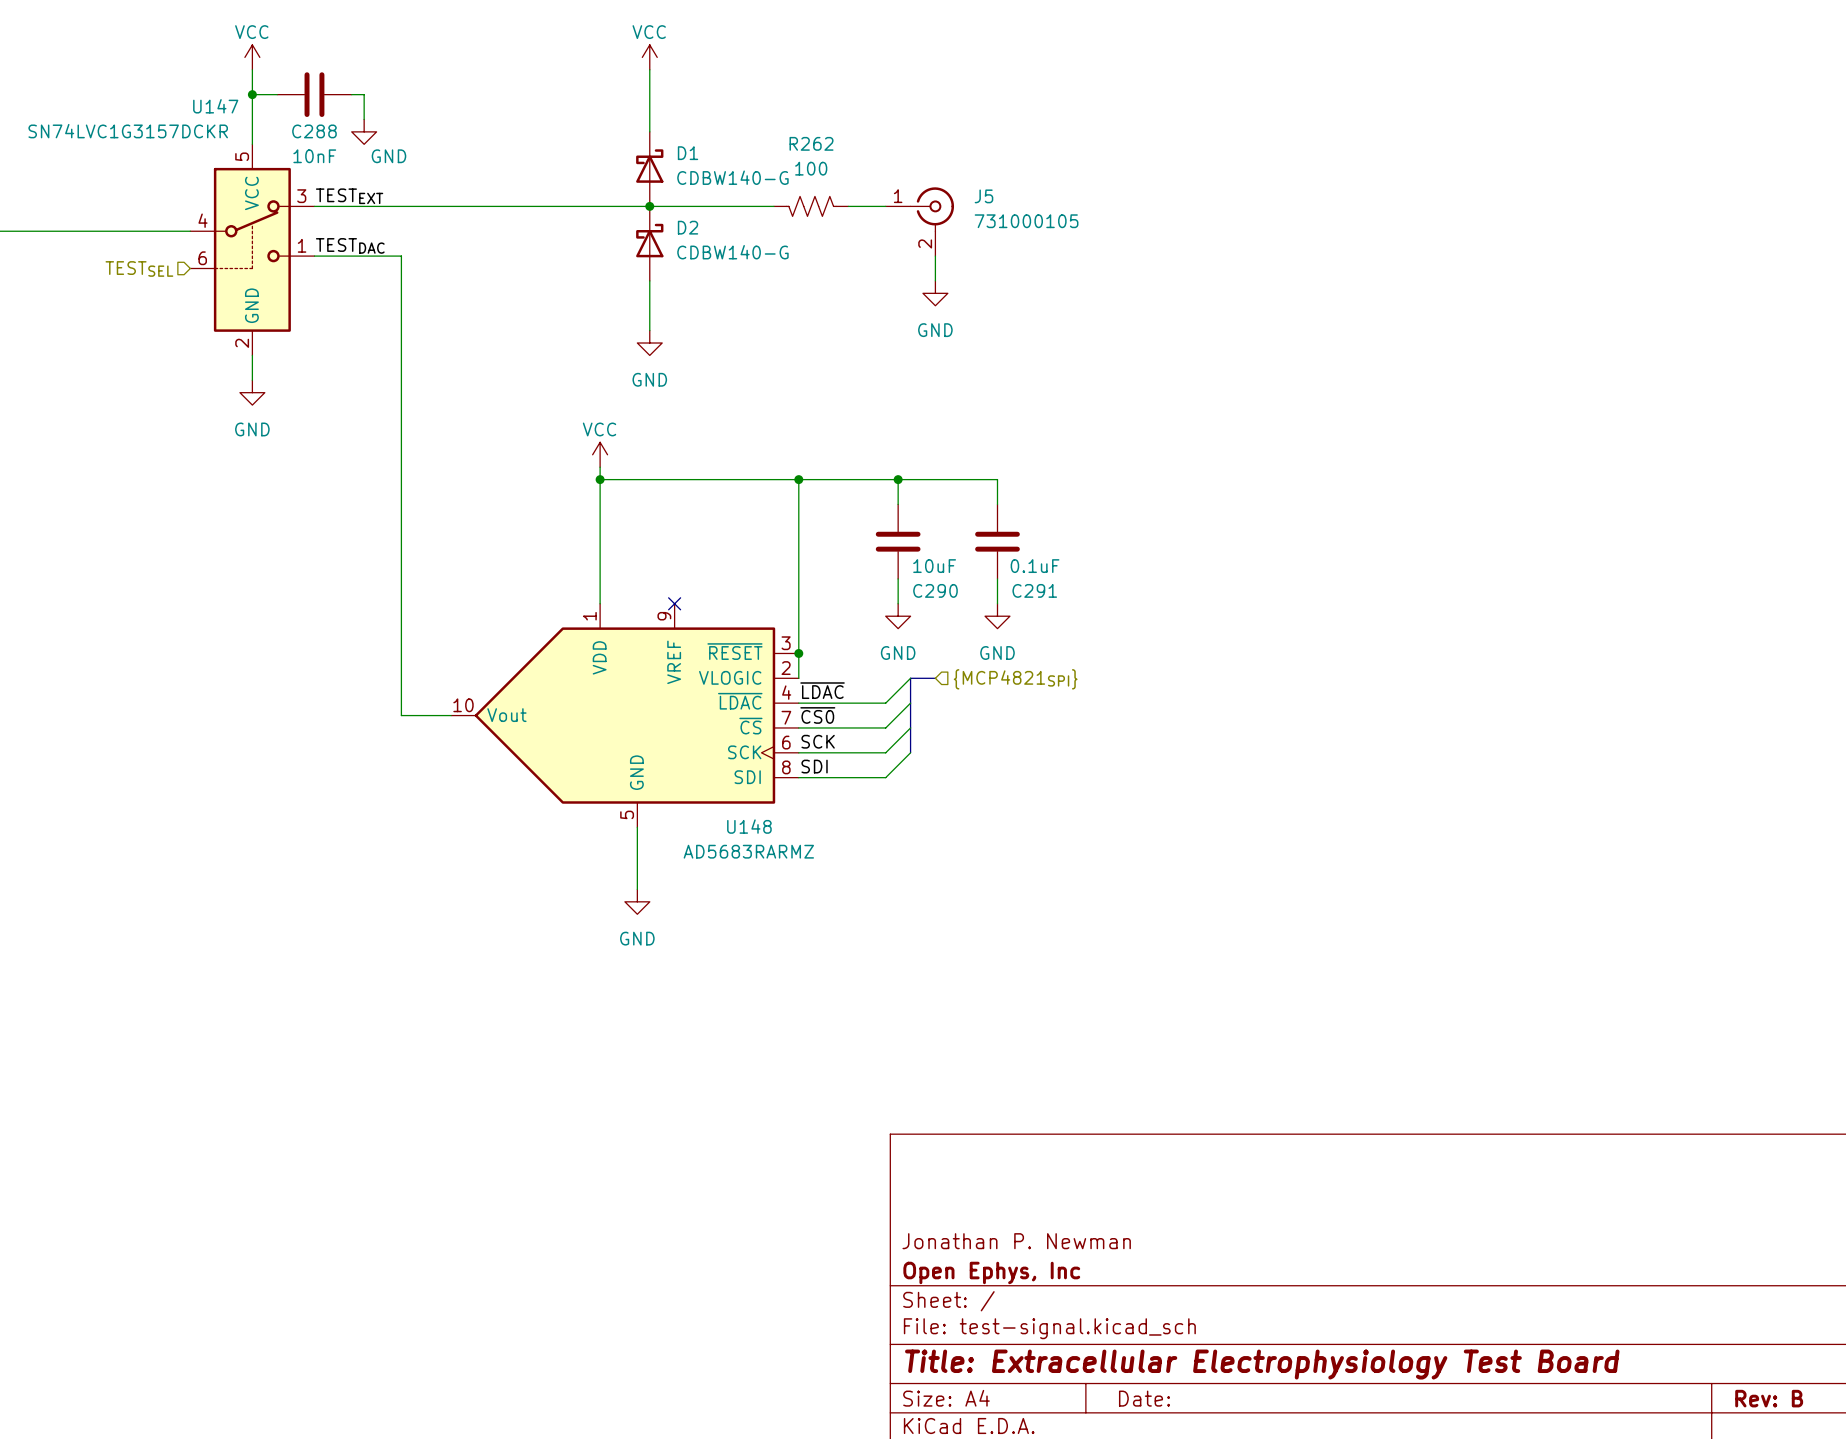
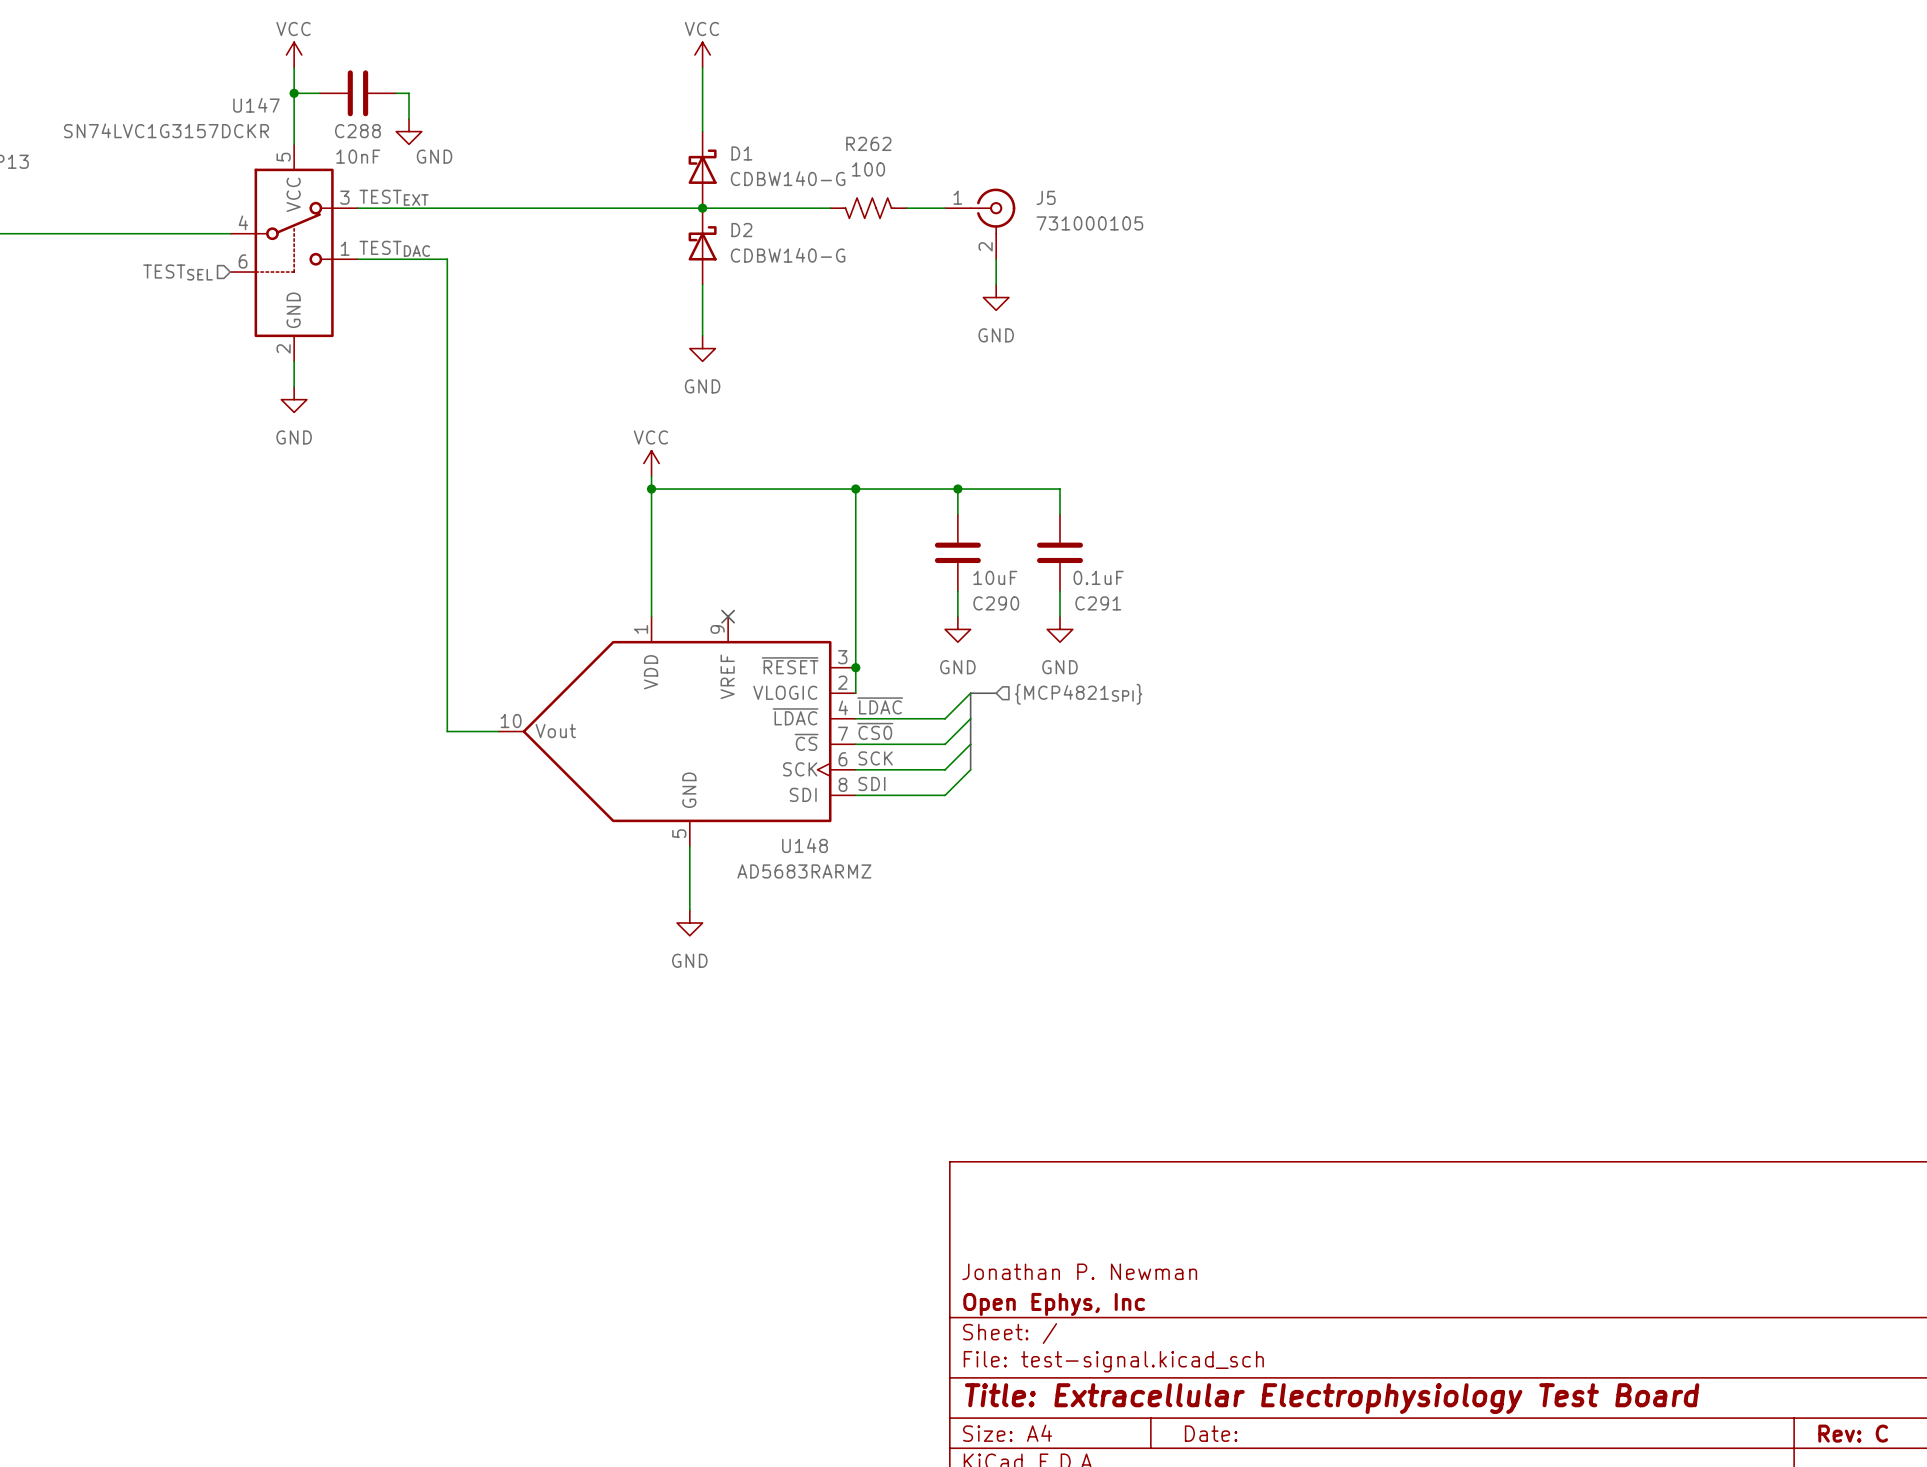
title block: Rev: B (1769, 1398) -> Rev: C (1853, 1433)

